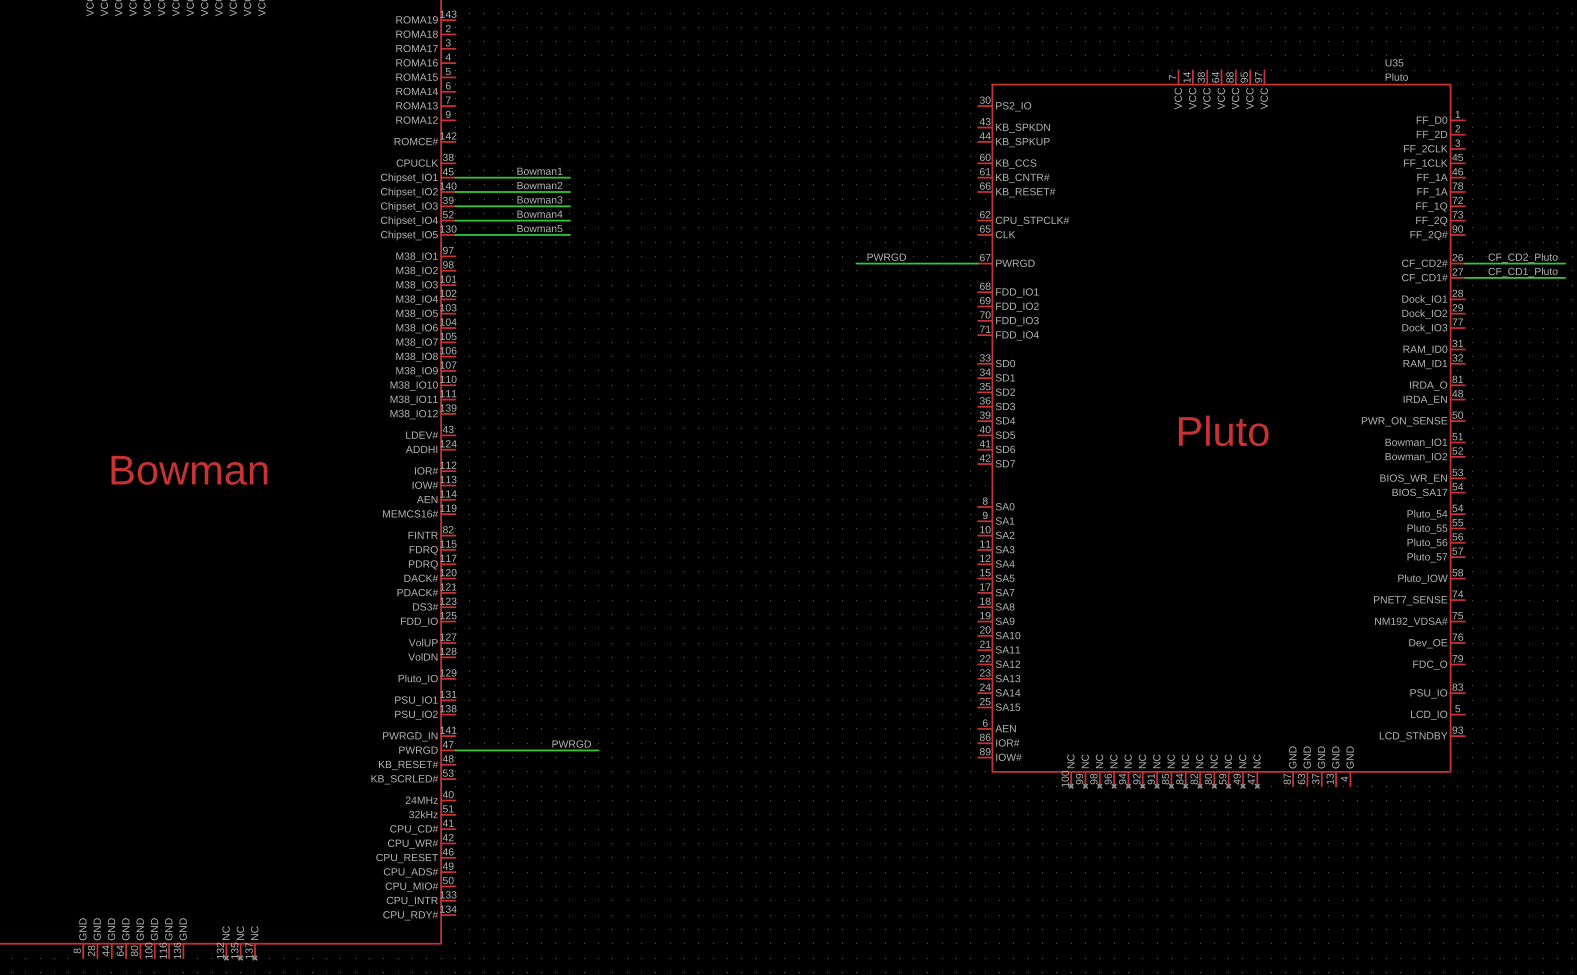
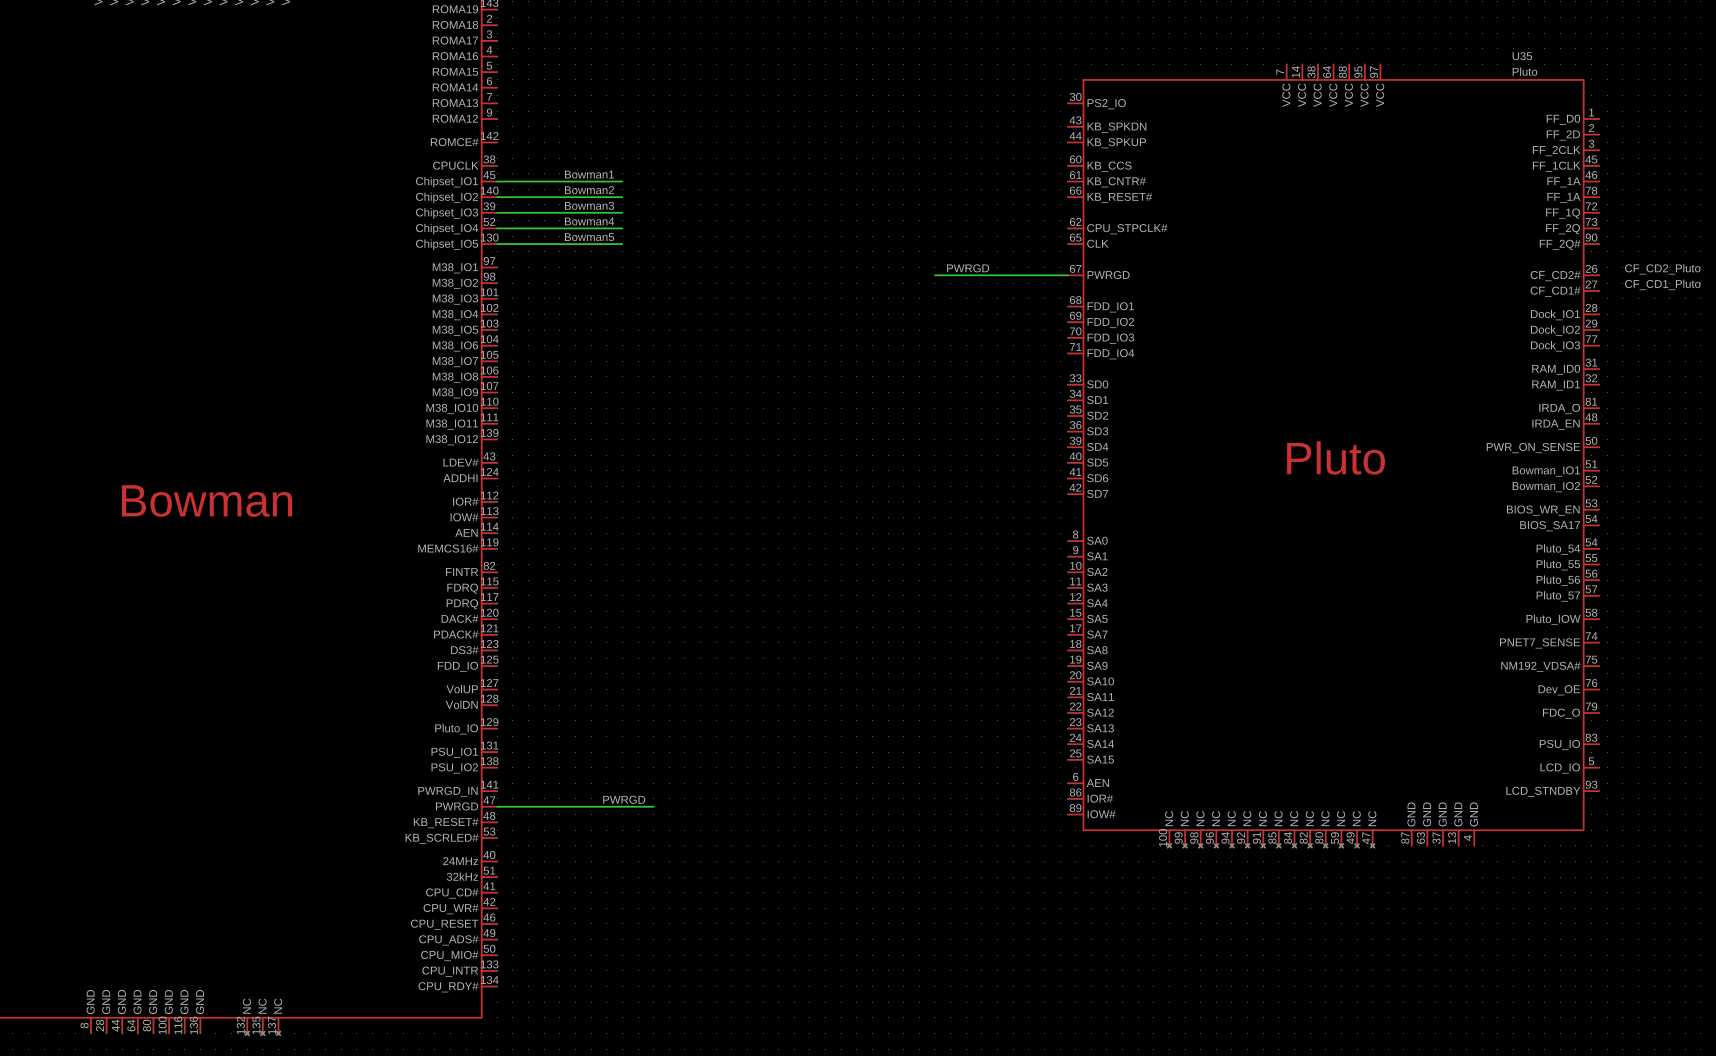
wire: (1464, 263) (1565, 263) -> none
wire: (1464, 277) (1565, 277) -> none

